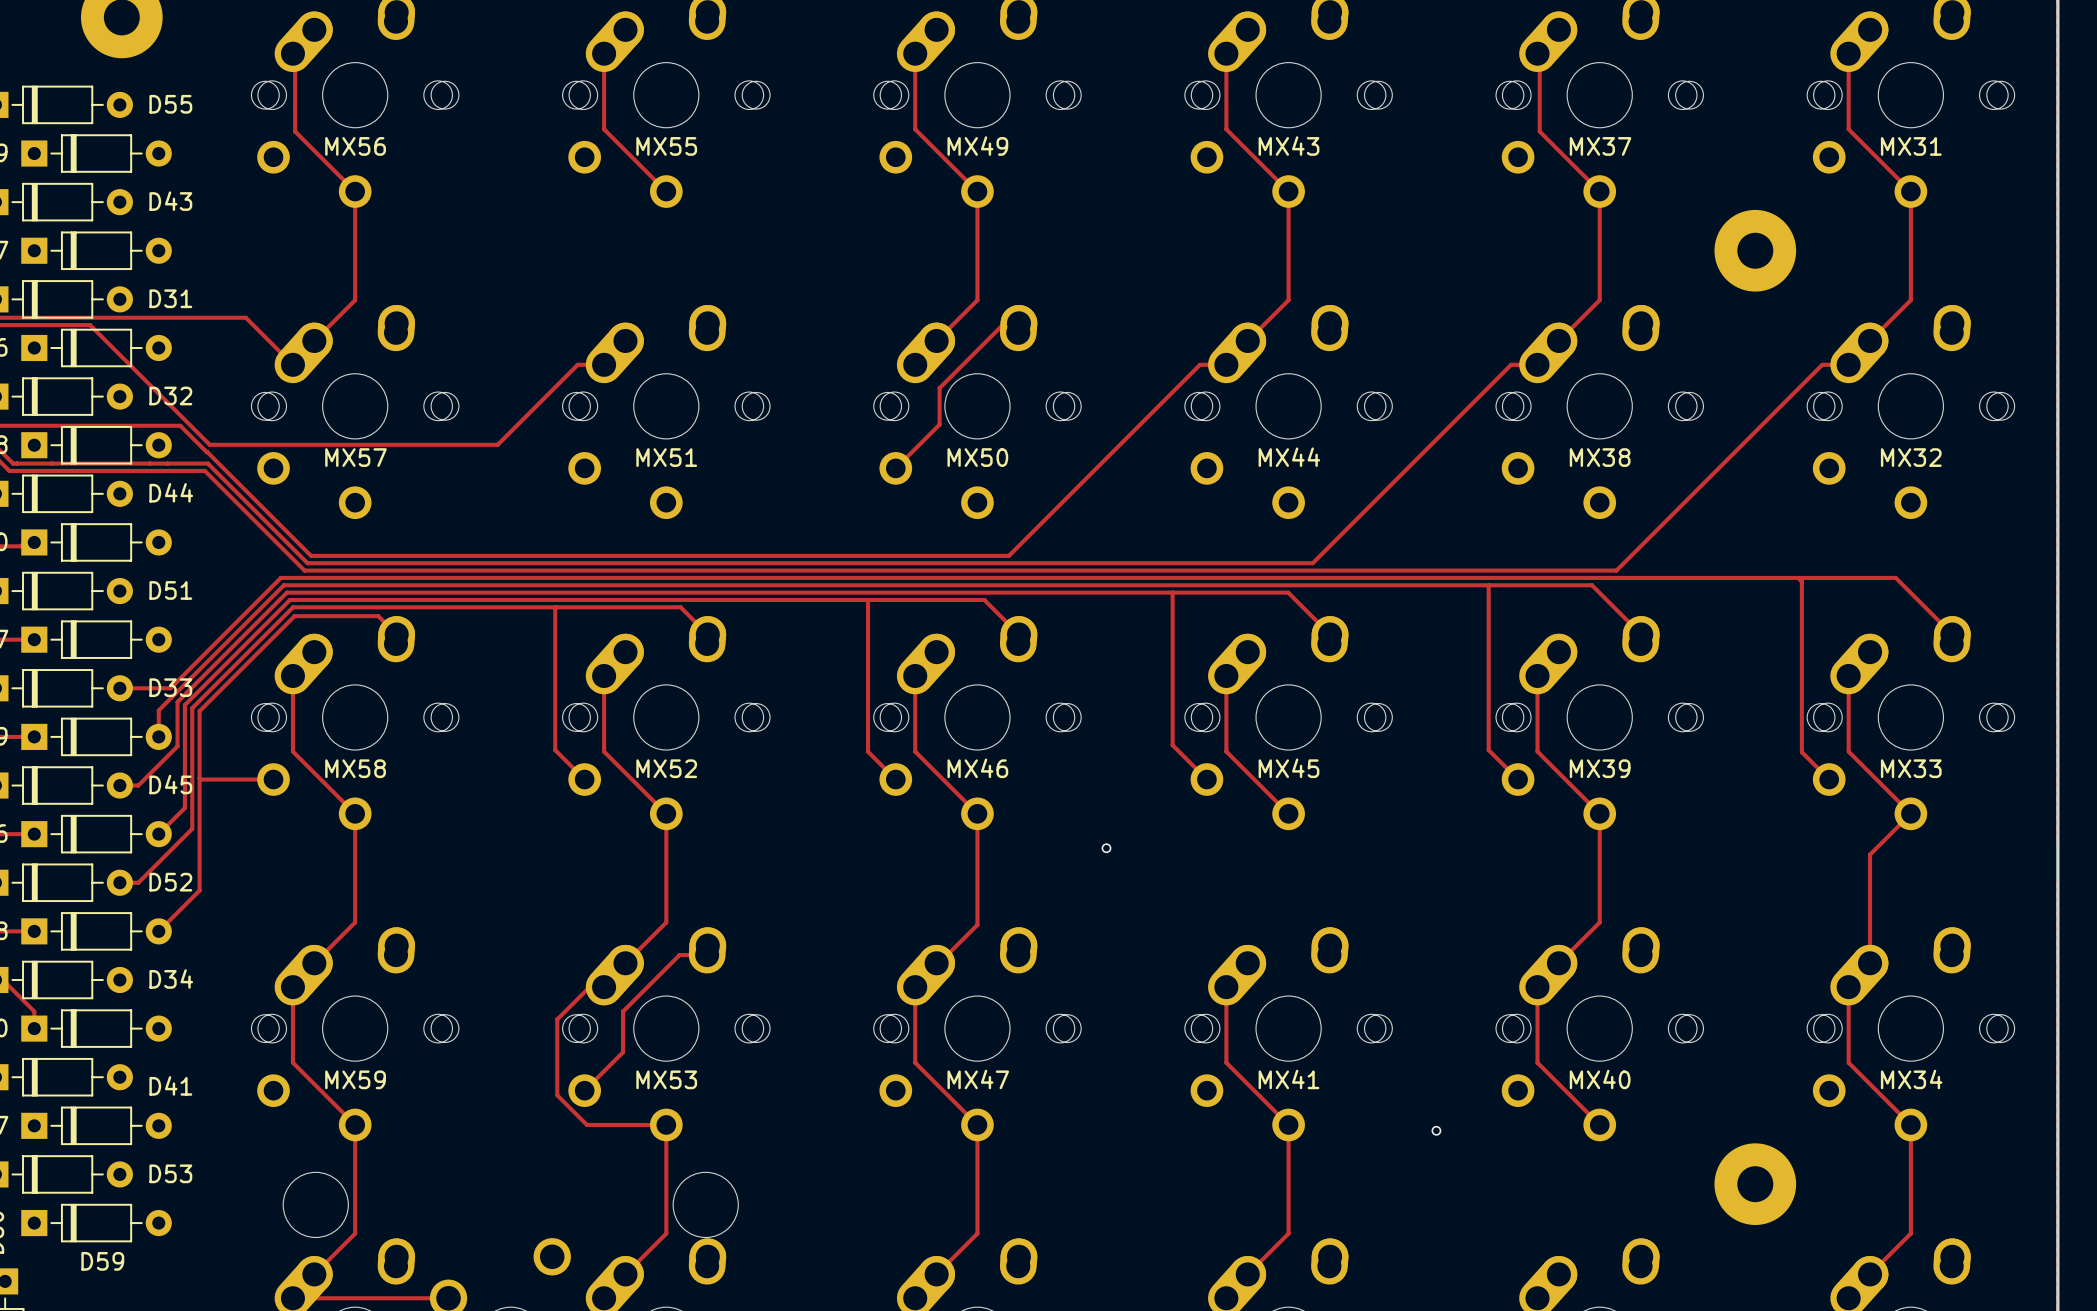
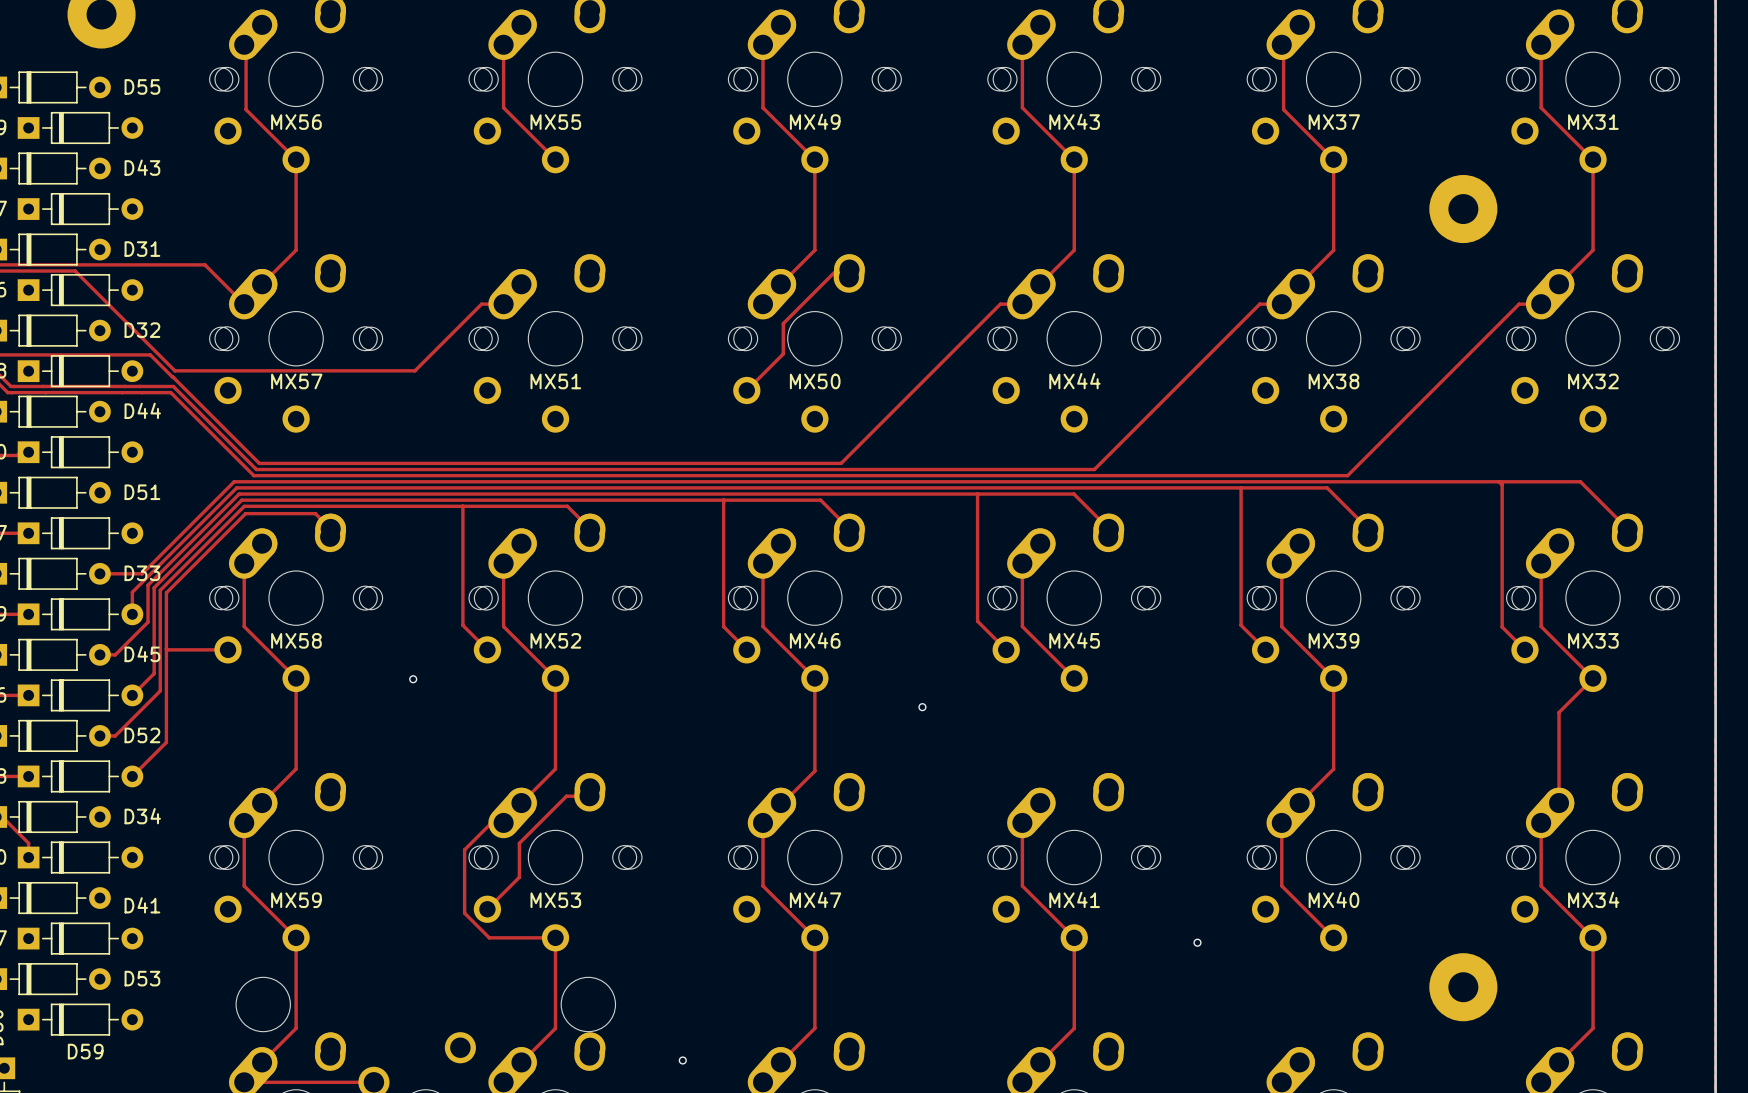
via: none -> (413, 679)
via: none -> (682, 1060)

